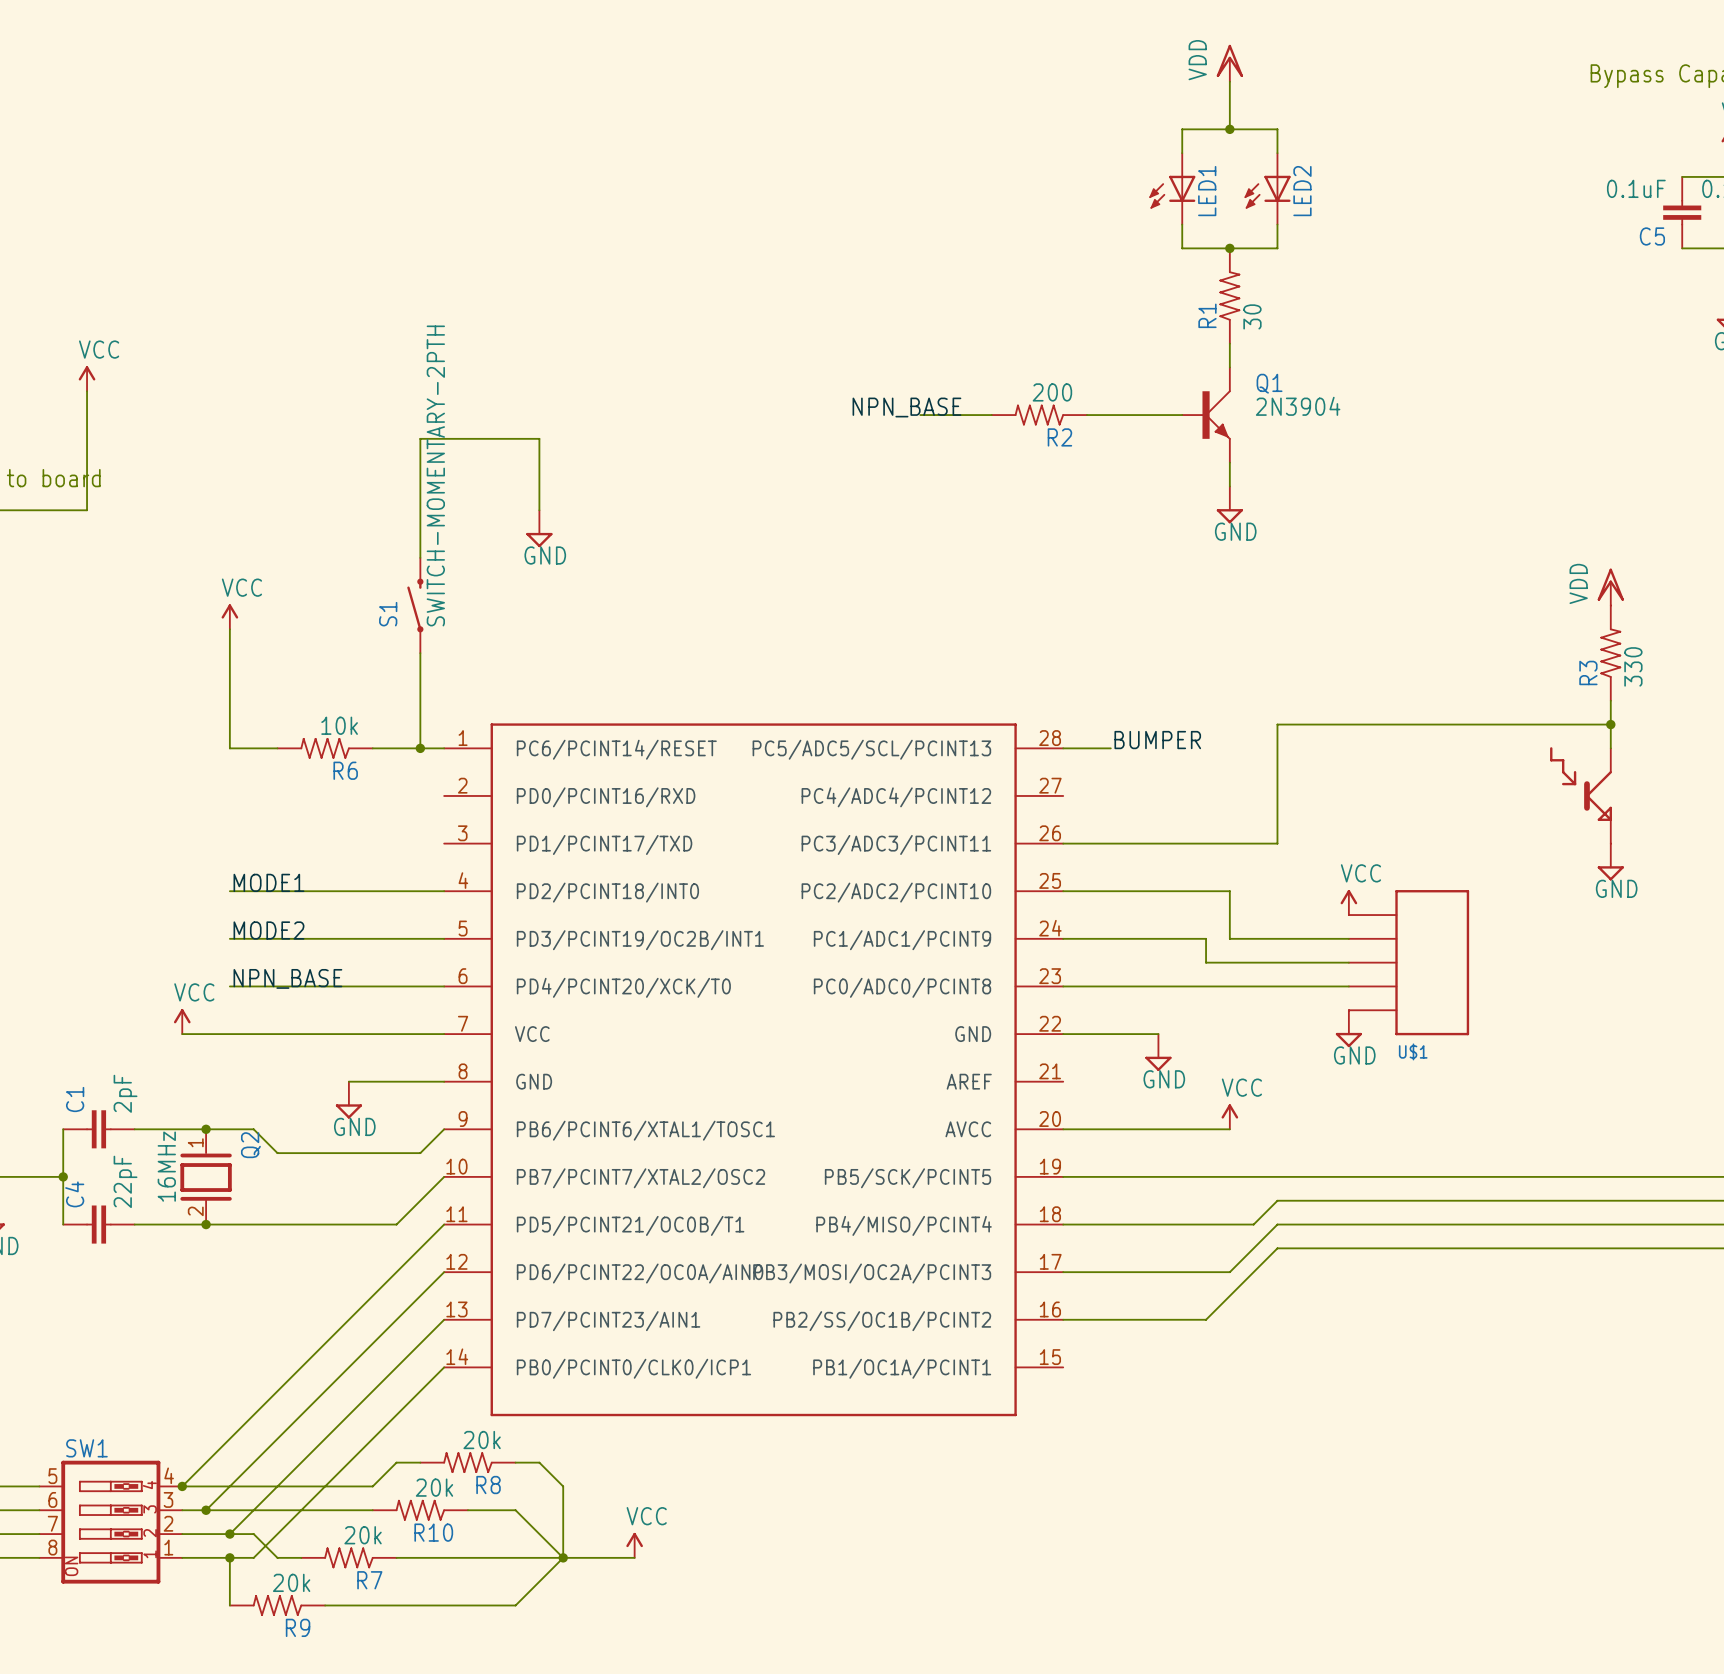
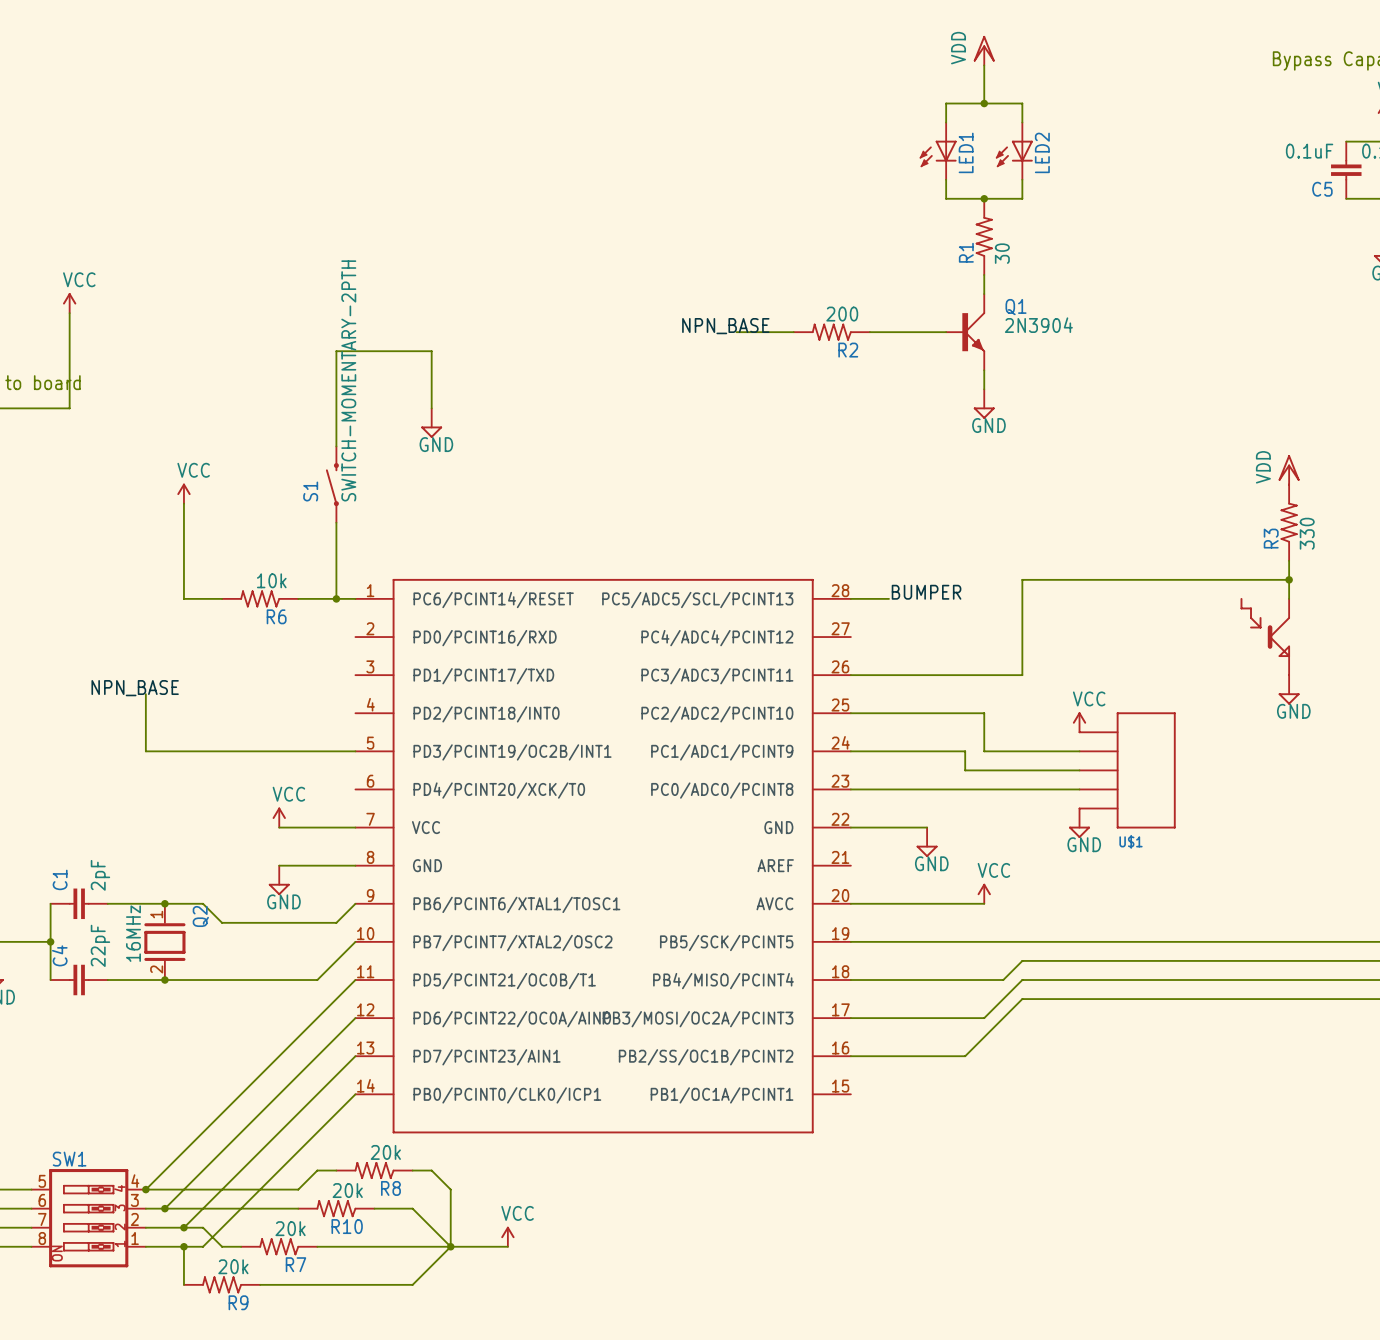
wire: none -> (145, 694) (145, 751) (183, 751)
label: MODE1 (268, 882) -> none
wire: (229, 891) (444, 891) -> none
label: MODE2 (268, 930) -> none
label position: NPN_BASE (287, 978) -> NPN_BASE (135, 688)
wire: (229, 986) (444, 986) -> none
power symbol position: VCC (182, 1021) -> VCC (279, 817)
wire: (182, 1034) (348, 1034) -> none

